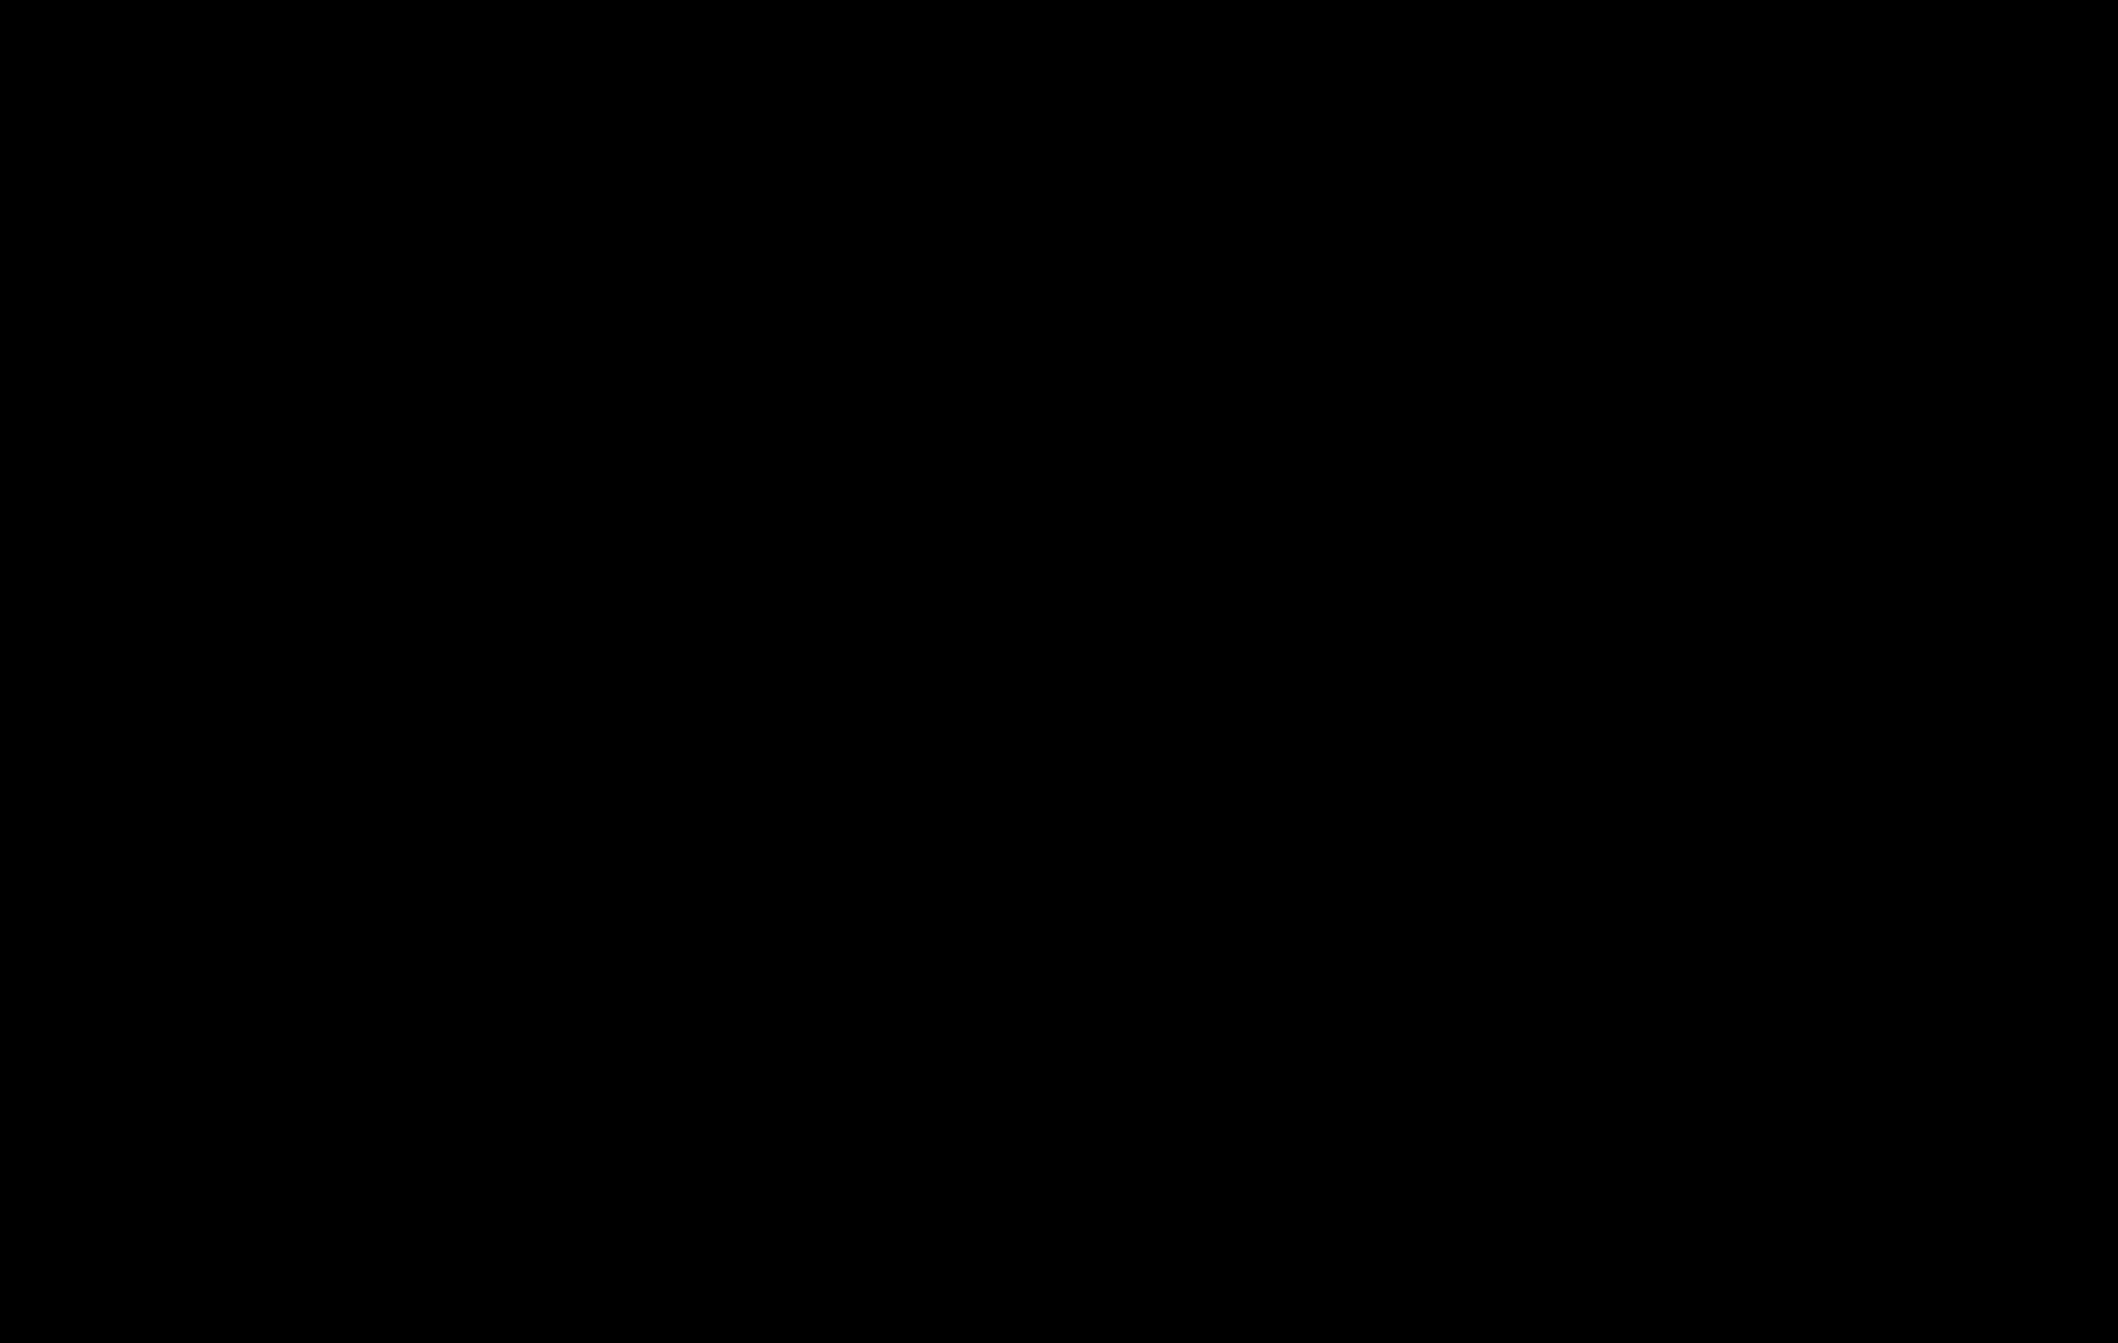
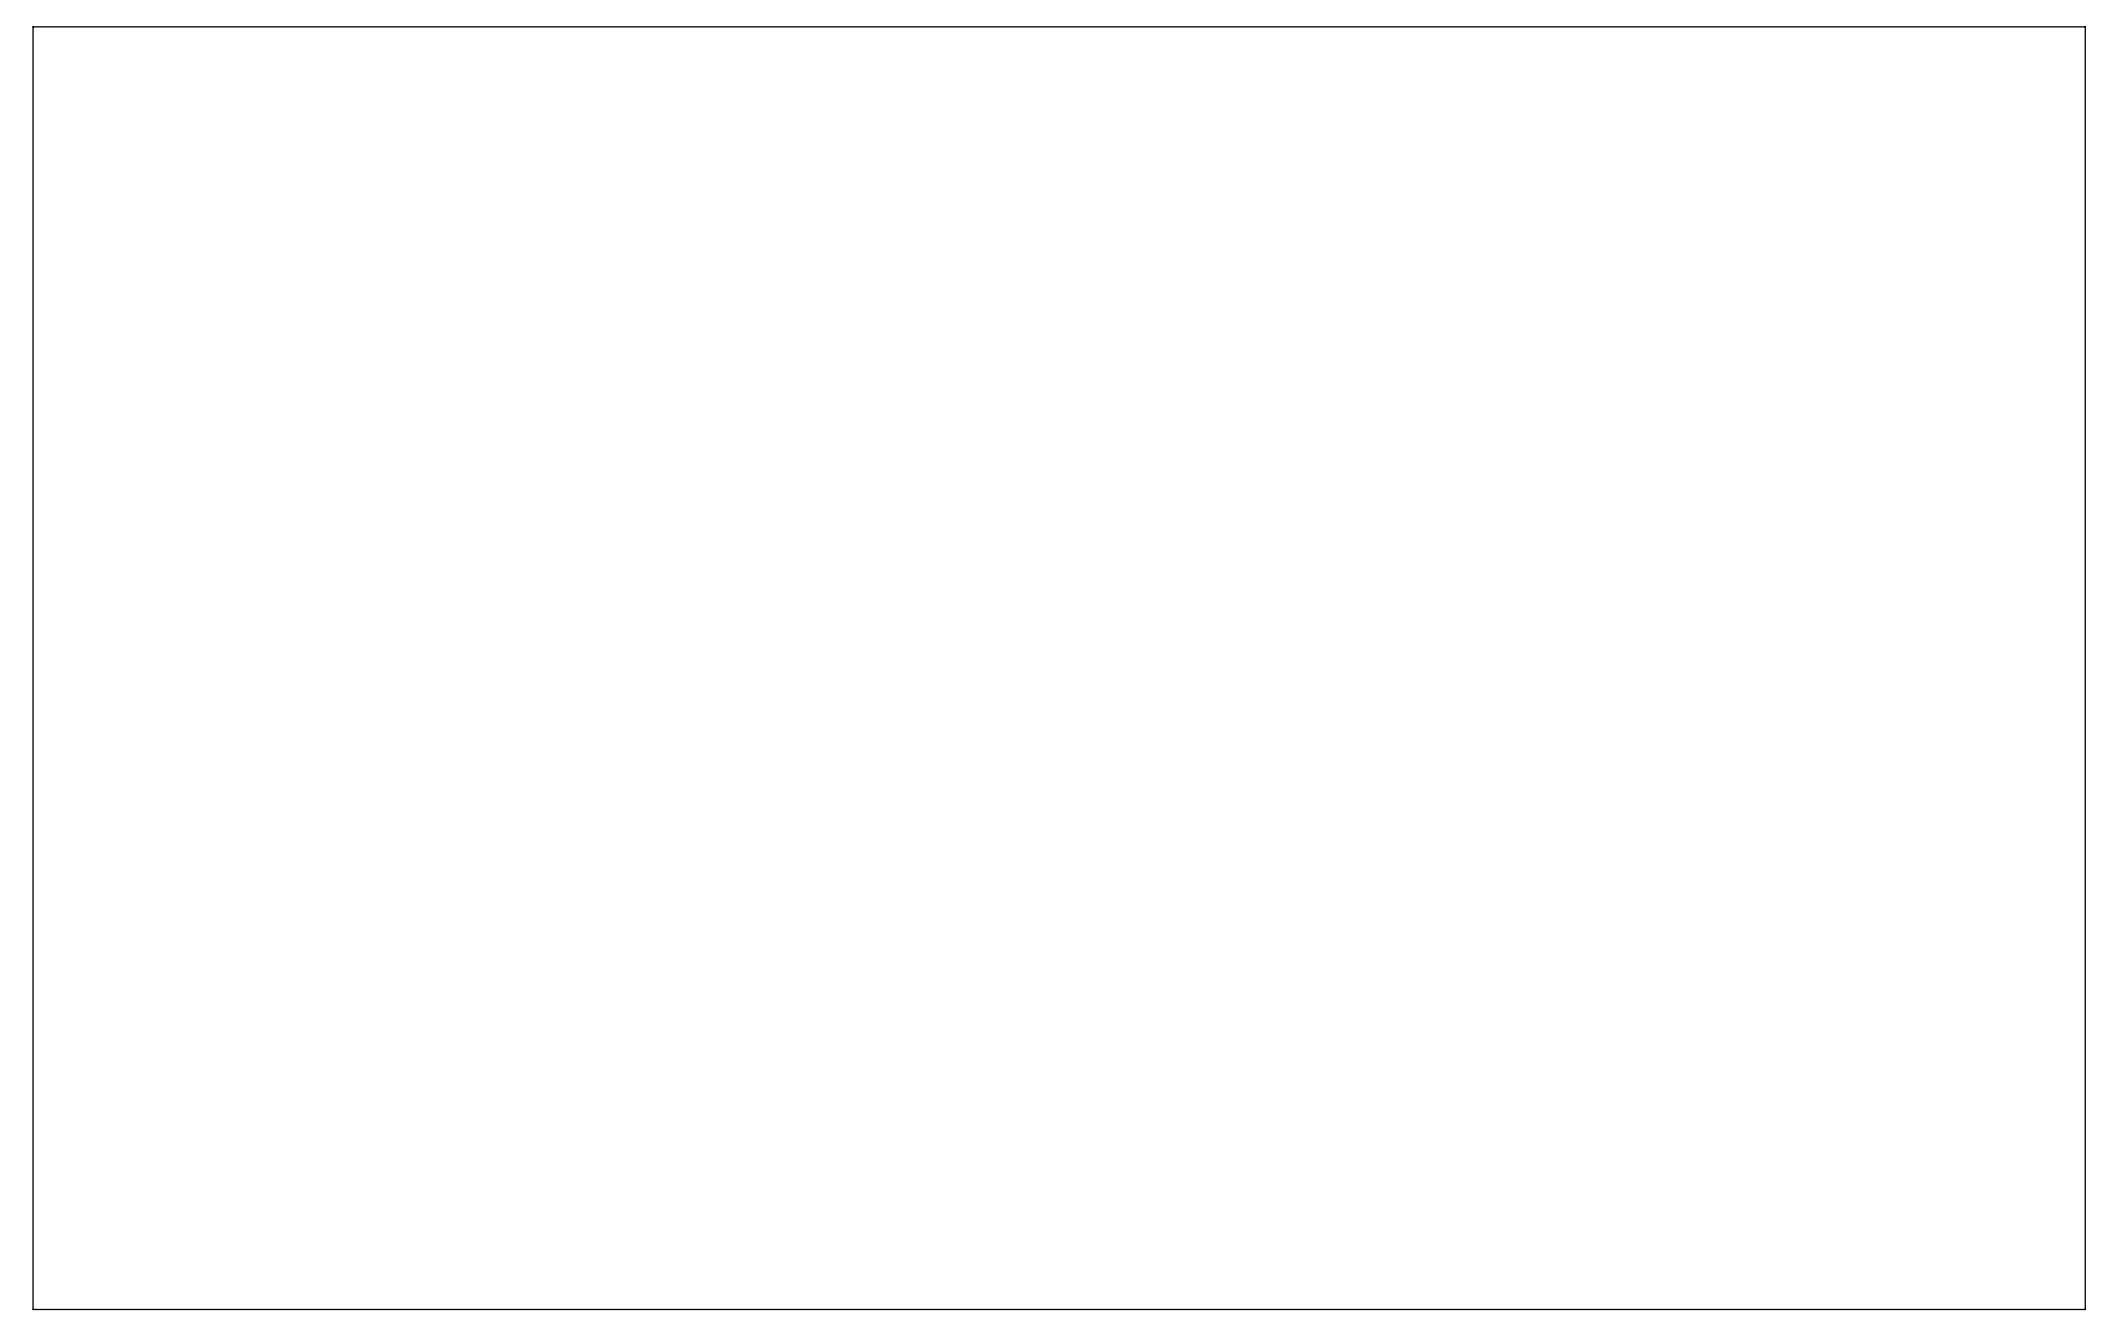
board edge: none -> (2085, 26) (33, 26) (33, 1309) (2085, 1309) (2085, 26)

